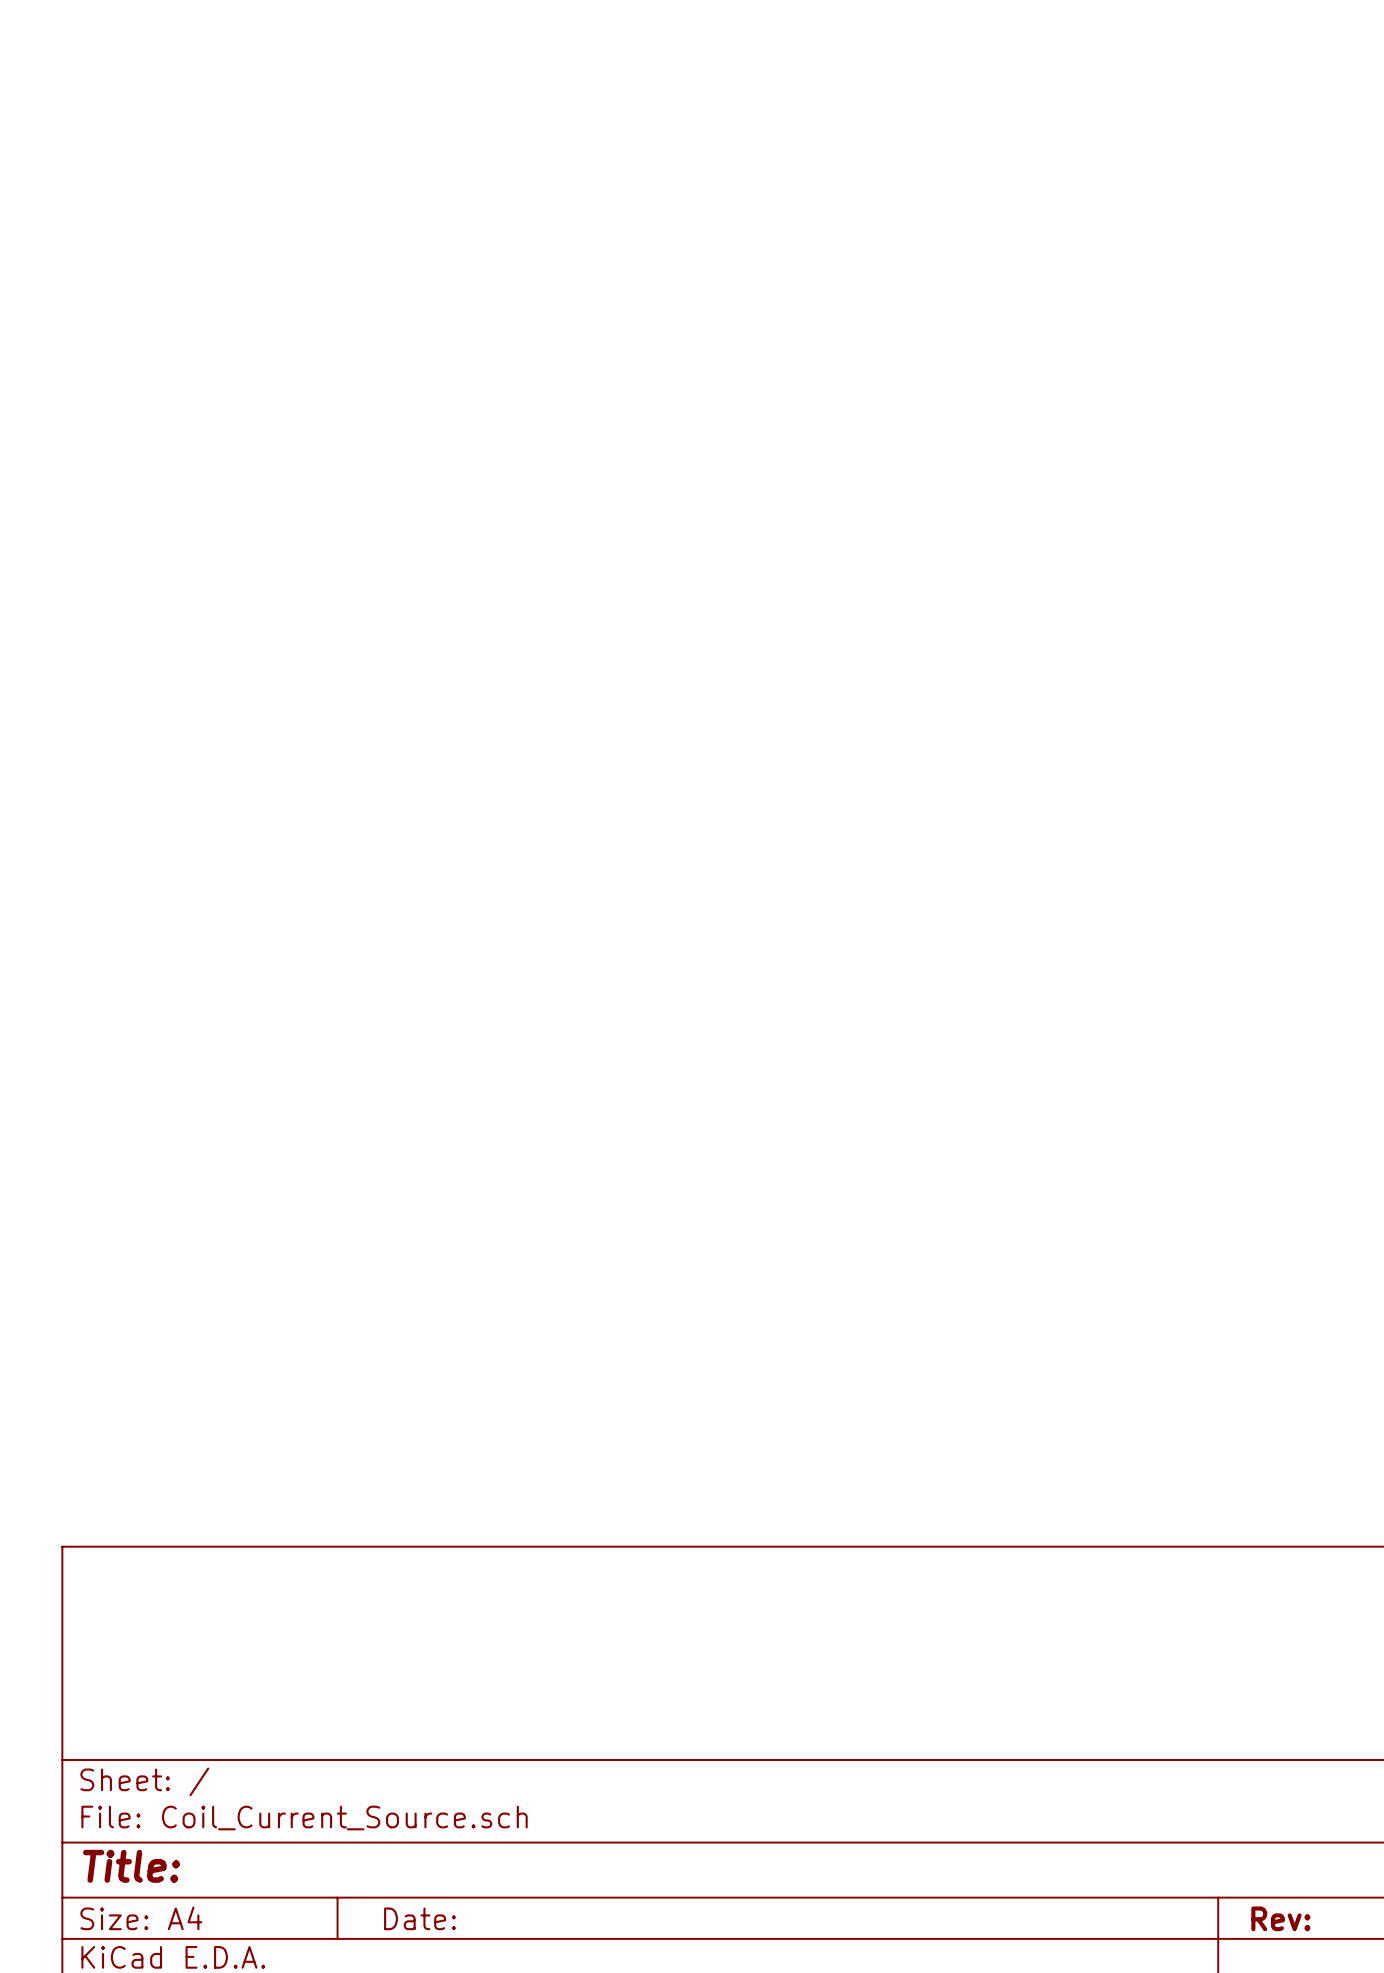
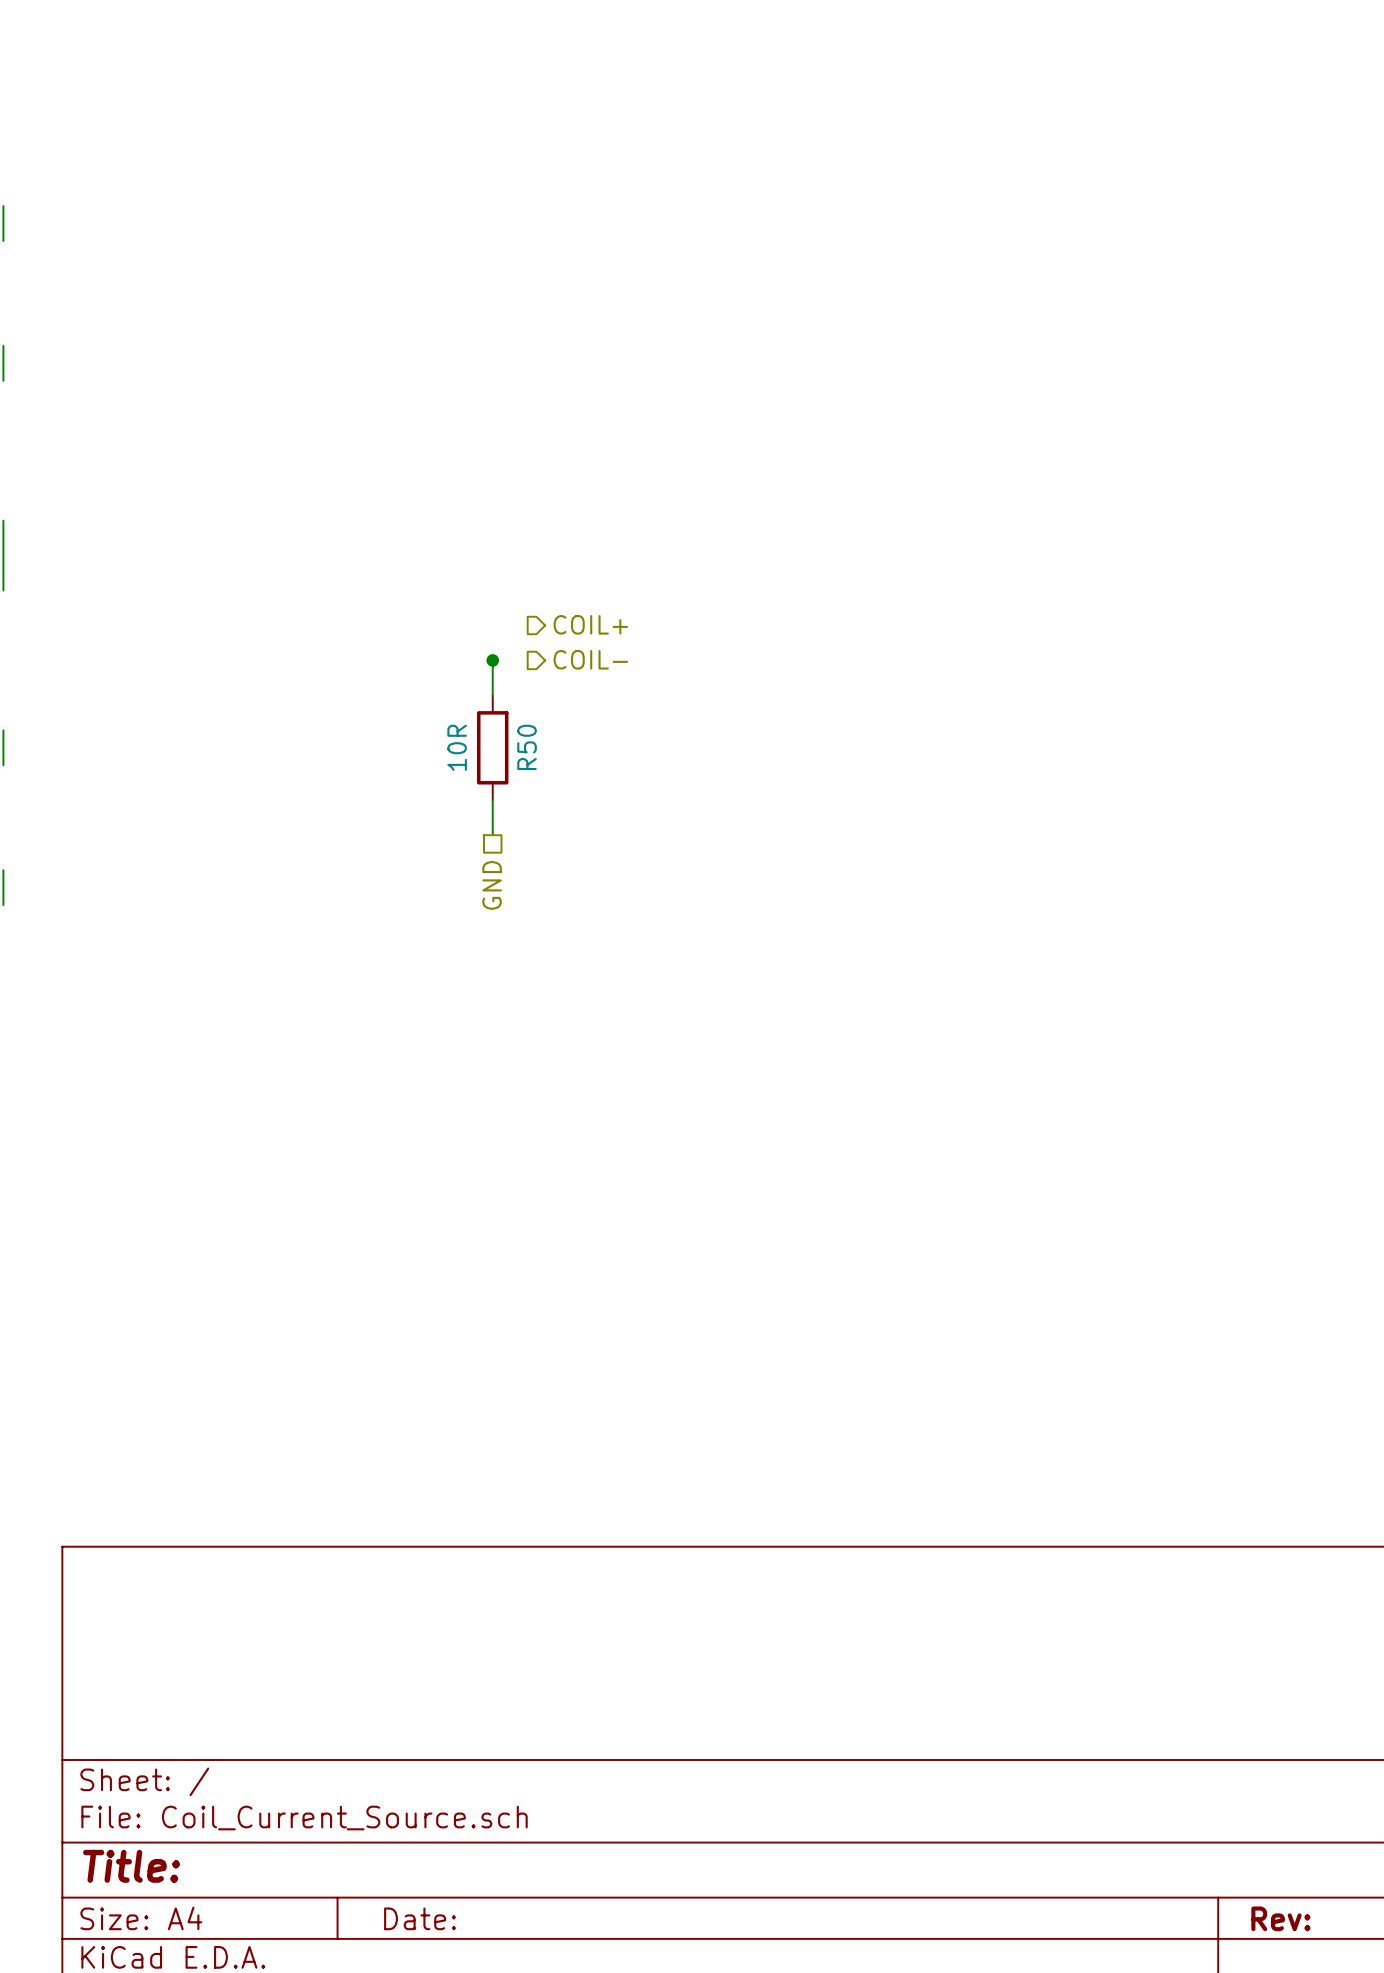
wire: none -> (3, 206) (3, 241)
wire: none -> (3, 345) (3, 380)
wire: none -> (3, 520) (3, 590)
hierarchical label: none -> COIL+ (590, 624)
hierarchical label: none -> COIL- (590, 659)
wire: none -> (492, 660) (492, 695)
junction: none -> (492, 660)
wire: none -> (3, 730) (3, 765)
R50: none -> 10R (492, 747)
wire: none -> (492, 800) (492, 835)
wire: none -> (3, 870) (3, 905)
hierarchical label: none -> GND (492, 885)

